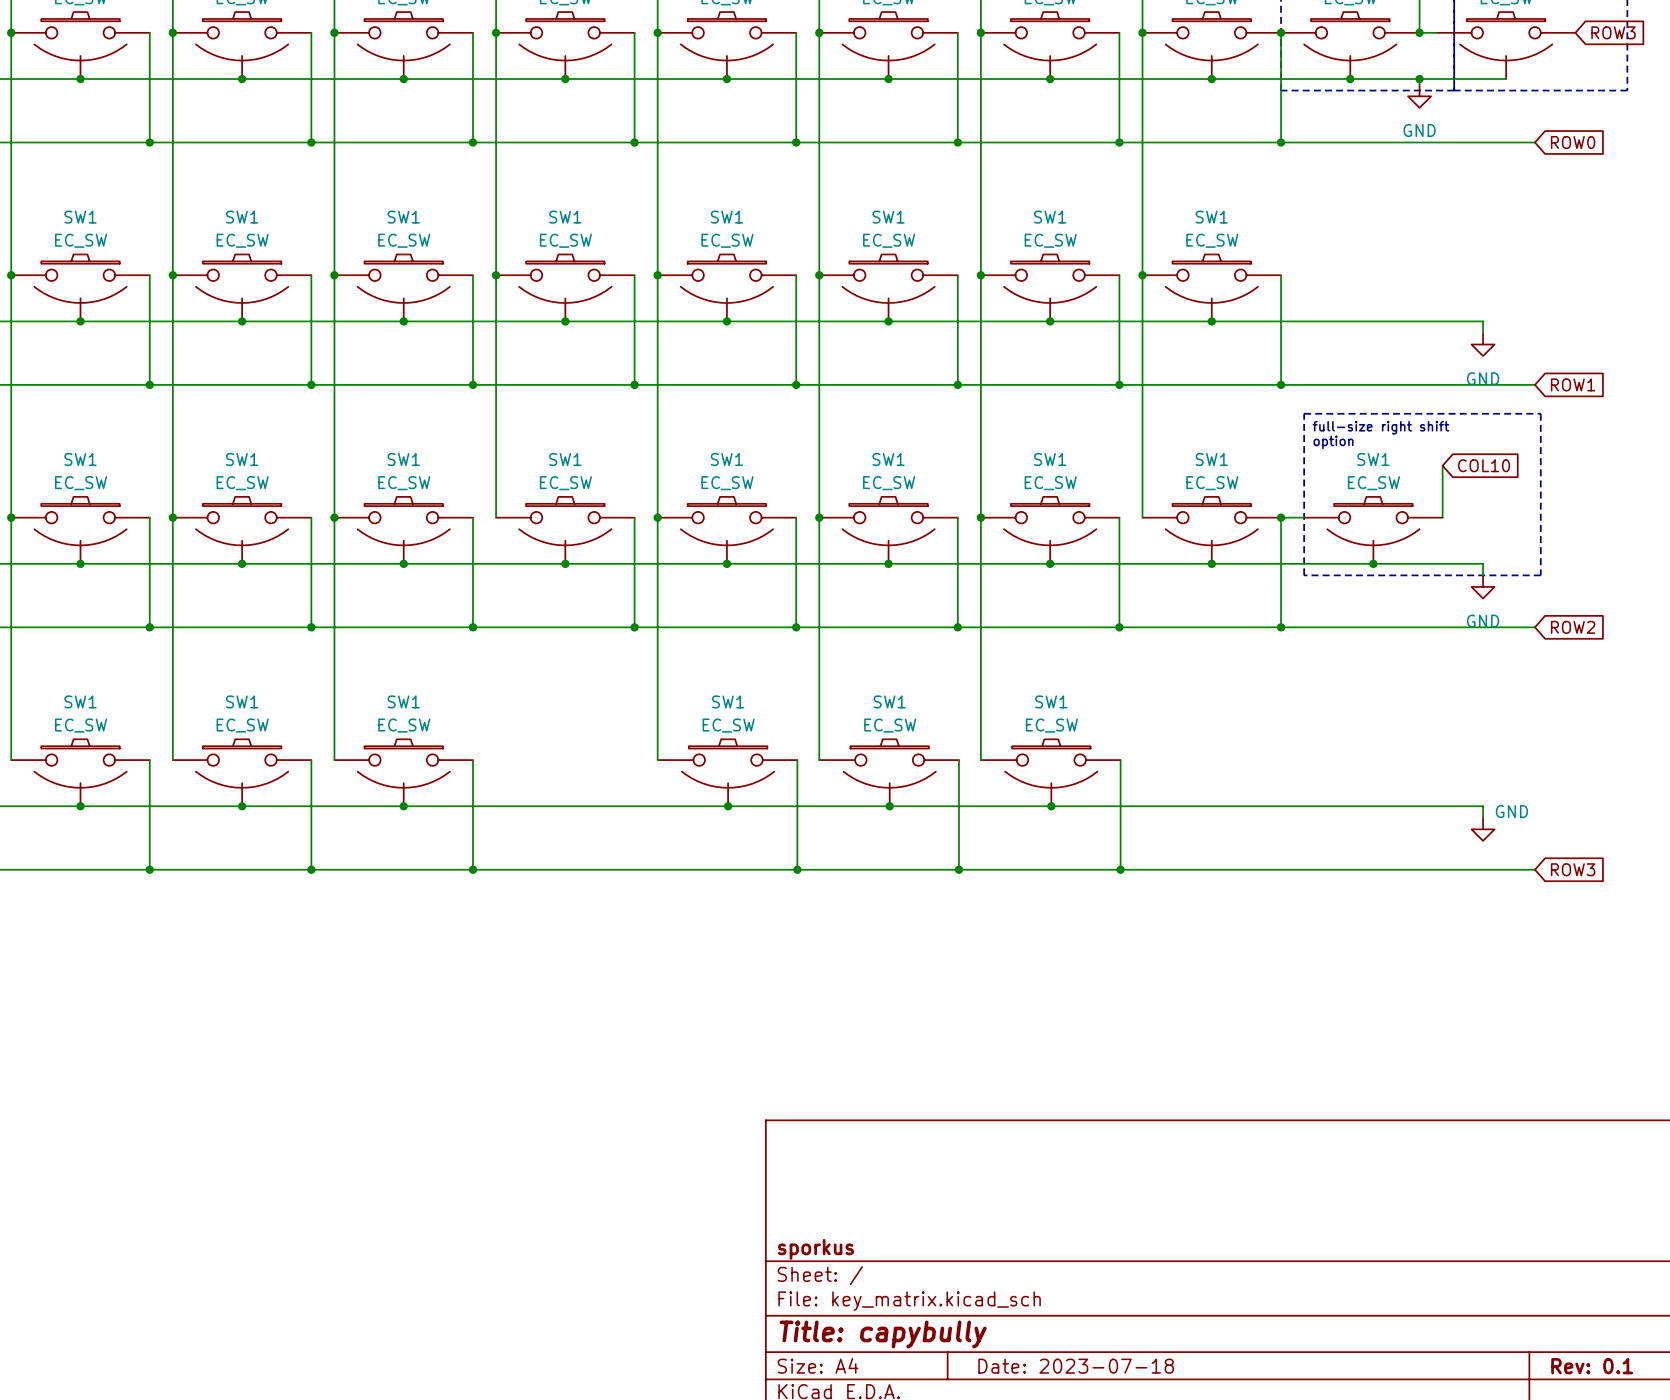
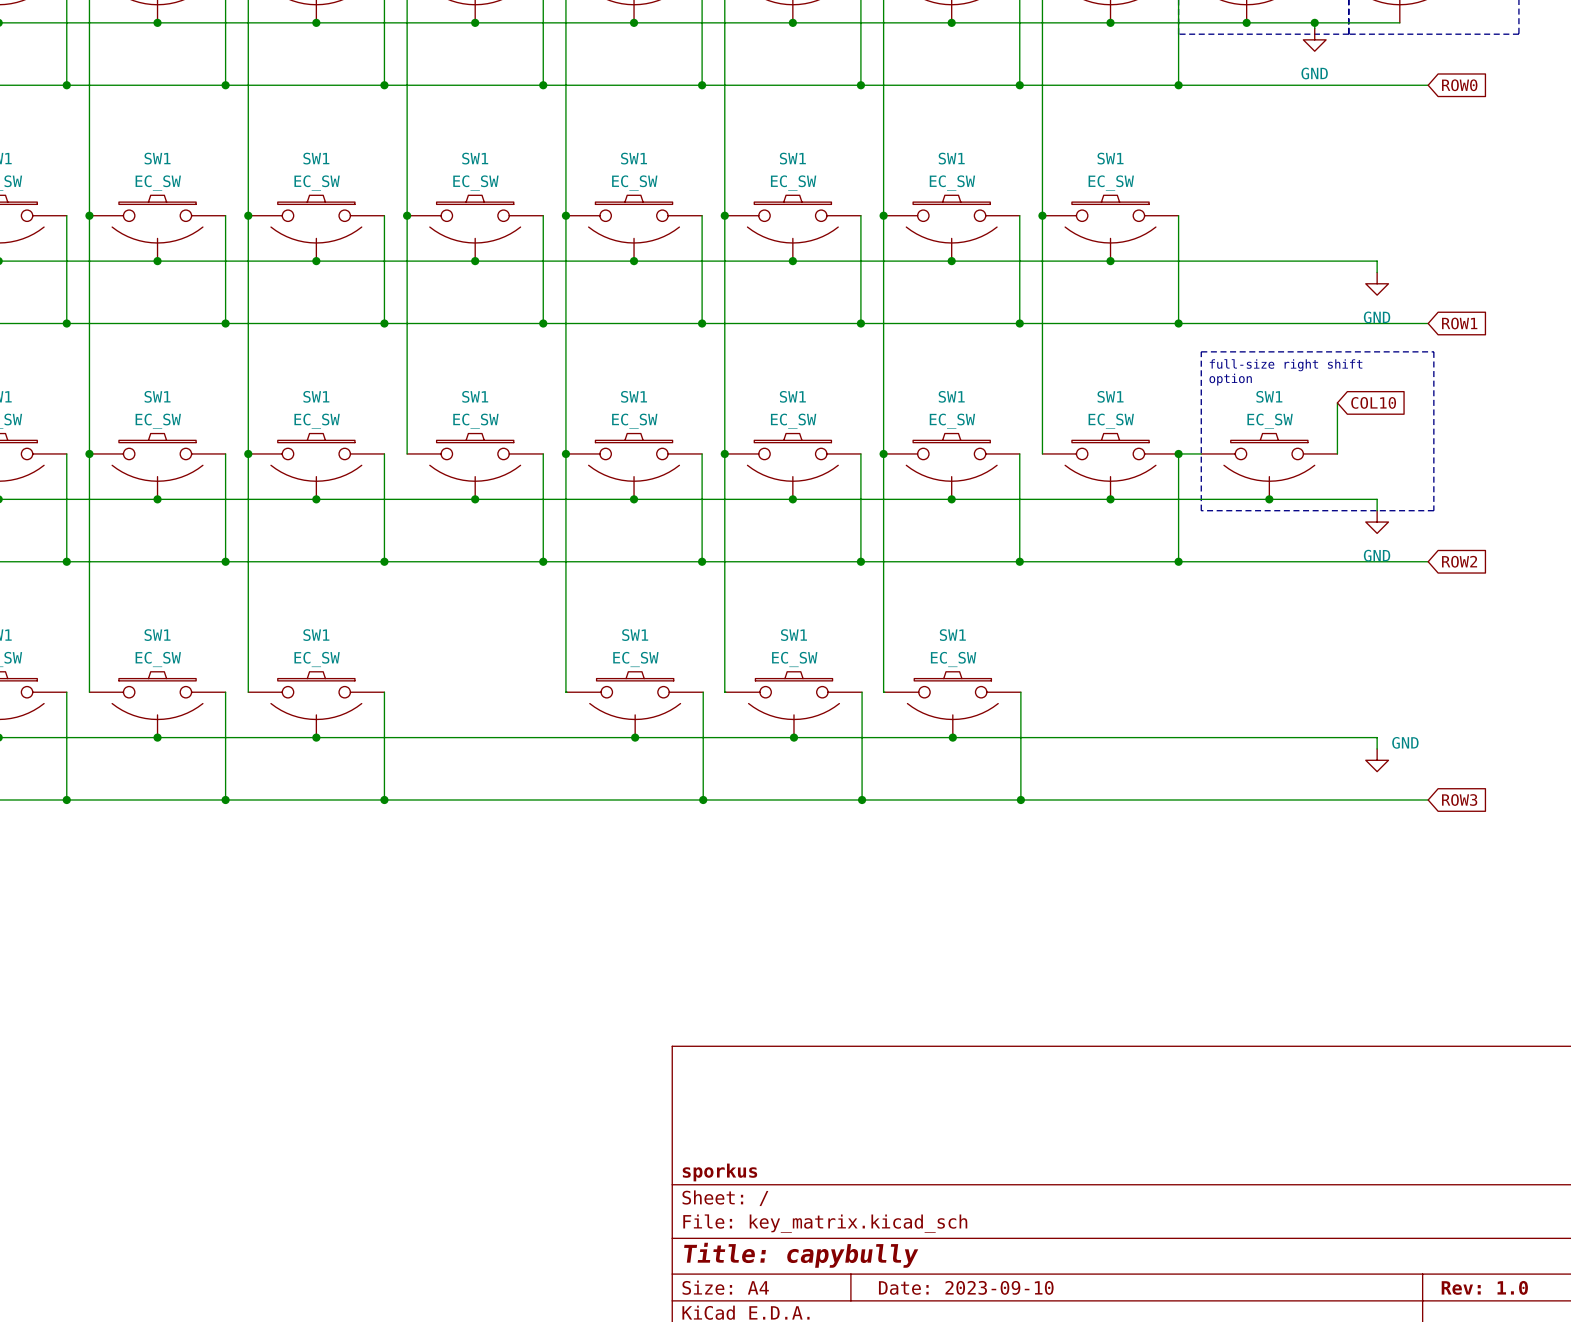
title block: Date: 2023-07-18 (1076, 1366) -> Date: 2023-09-10 (966, 1287)
title block: Rev: 0.1 (1592, 1366) -> Rev: 1.0 (1484, 1287)

